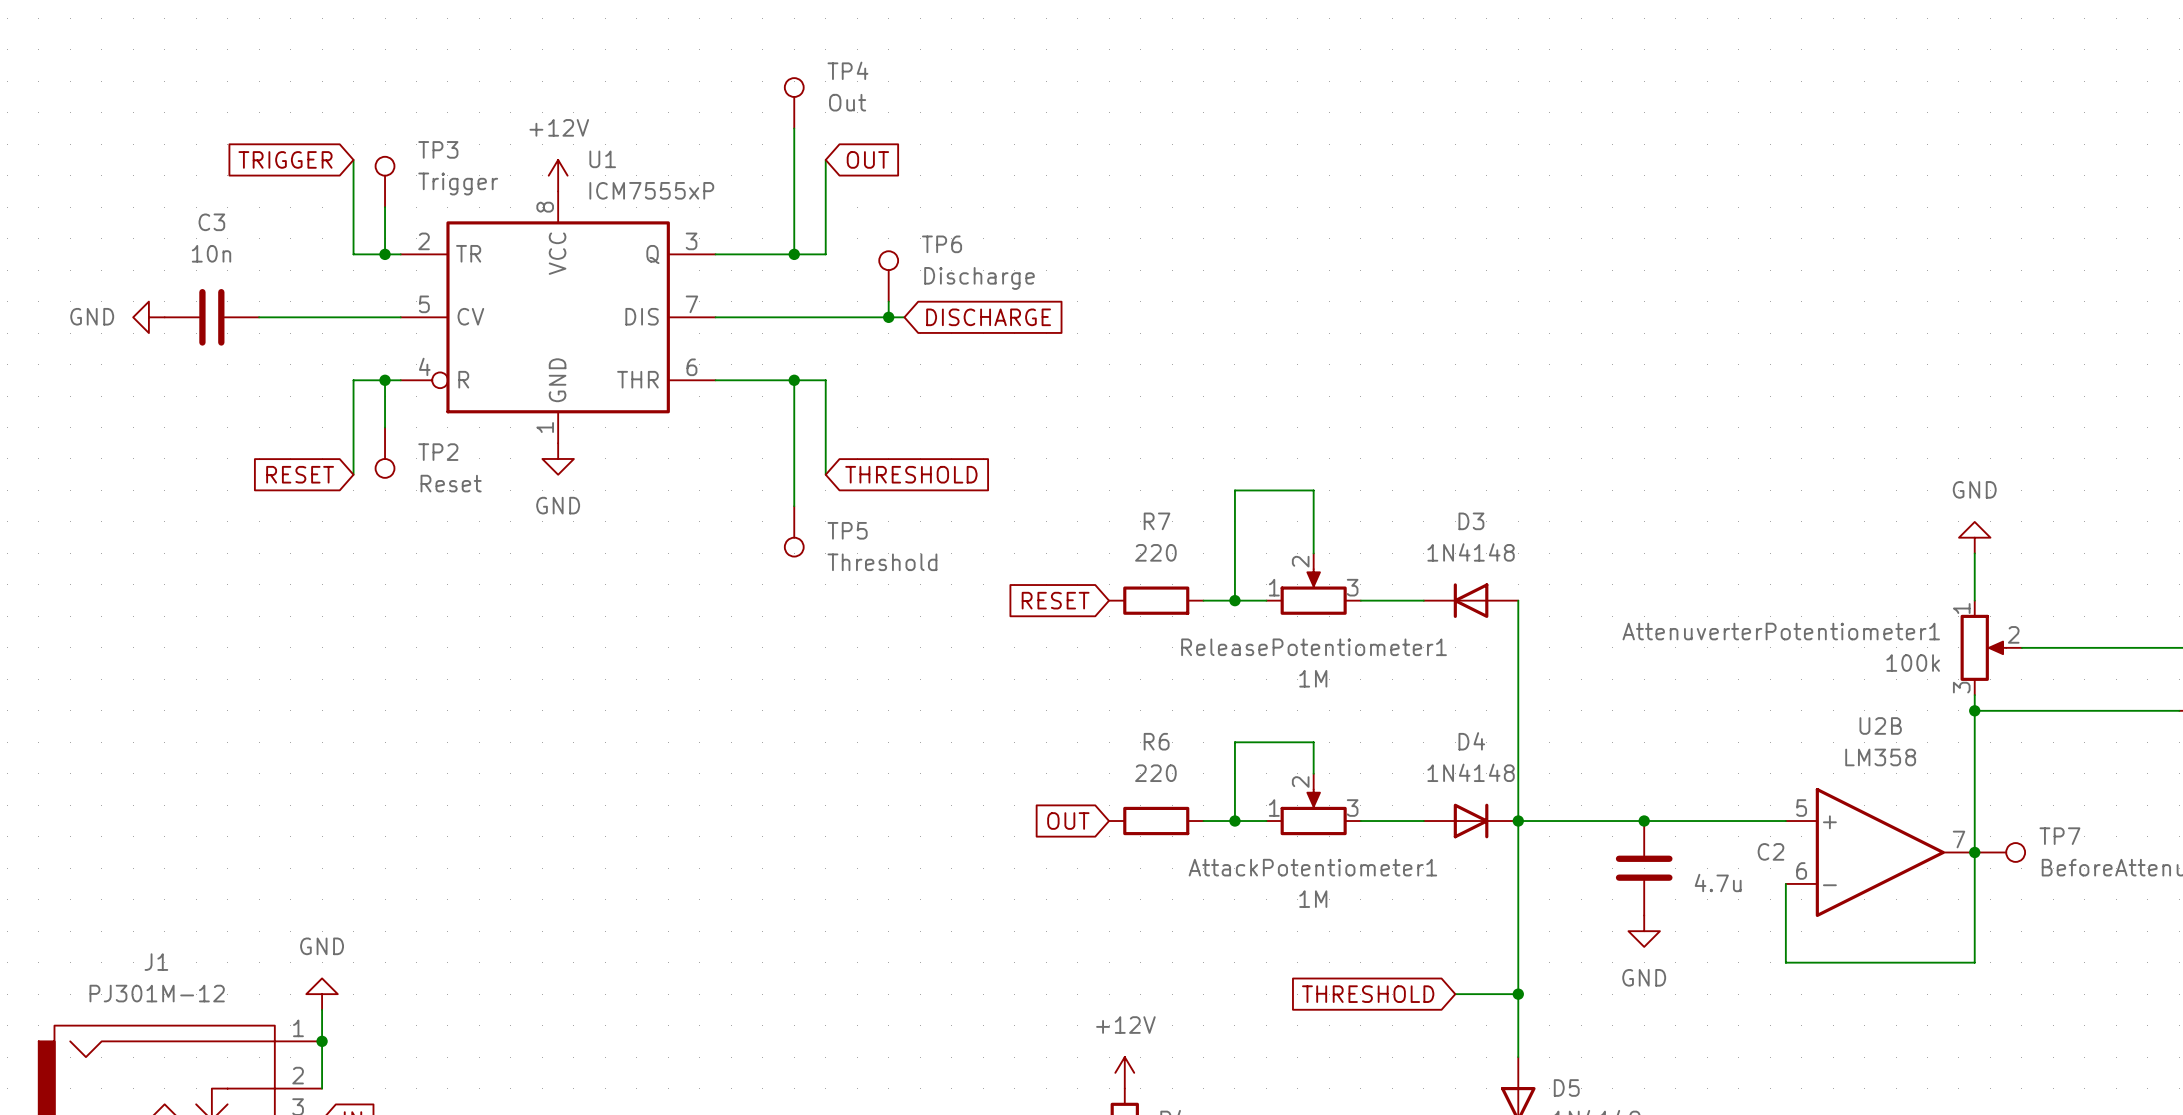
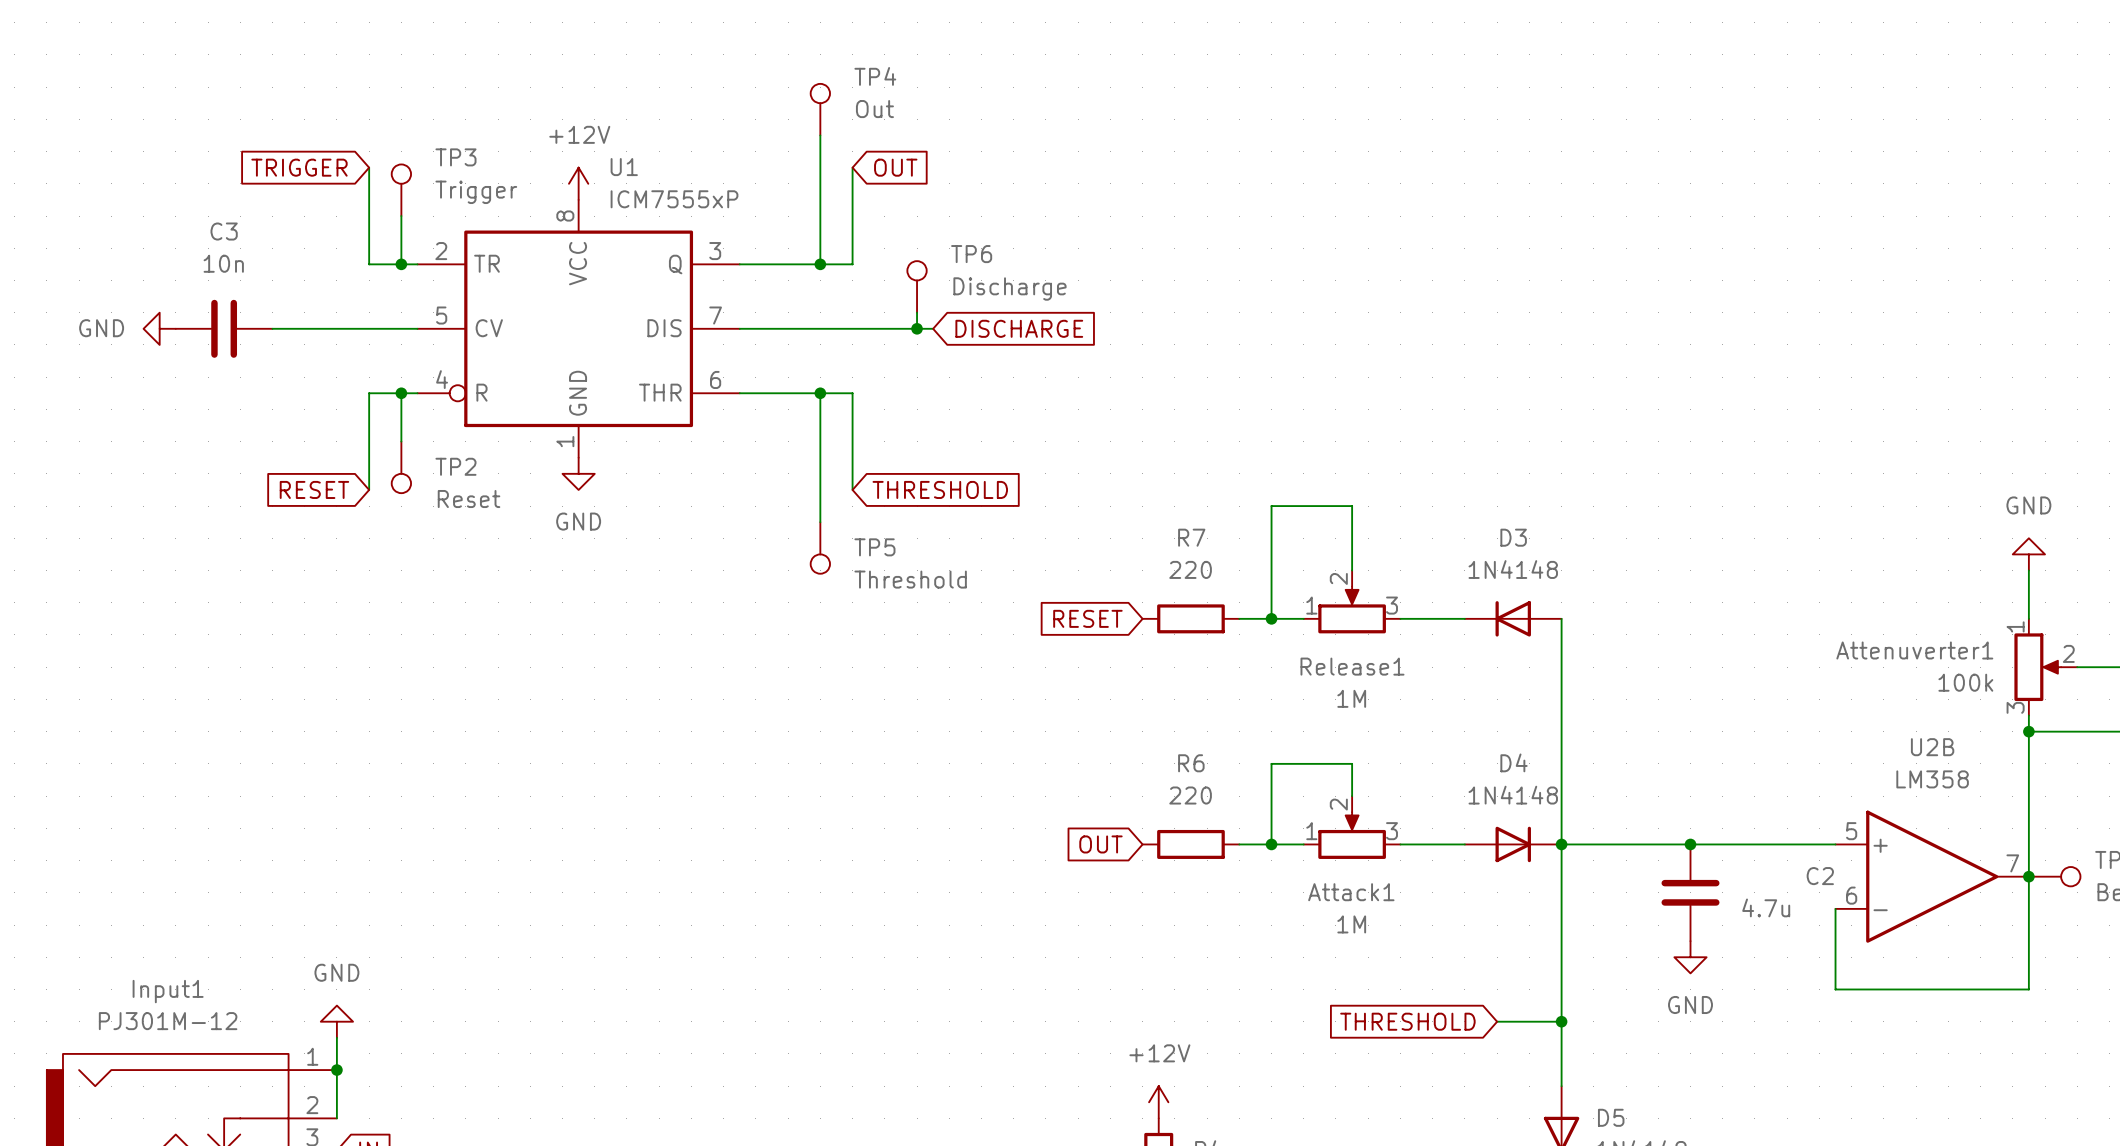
AttenuverterPotentiometer1 name: AttenuverterPotentiometer1 (1781, 631) -> Attenuverter1 (1914, 650)
ReleasePotentiometer1 name: ReleasePotentiometer1 (1314, 647) -> Release1 (1352, 666)
AttackPotentiometer1 name: AttackPotentiometer1 (1312, 867) -> Attack1 (1351, 892)
J1 name: J1 (156, 962) -> Input1 (168, 991)

